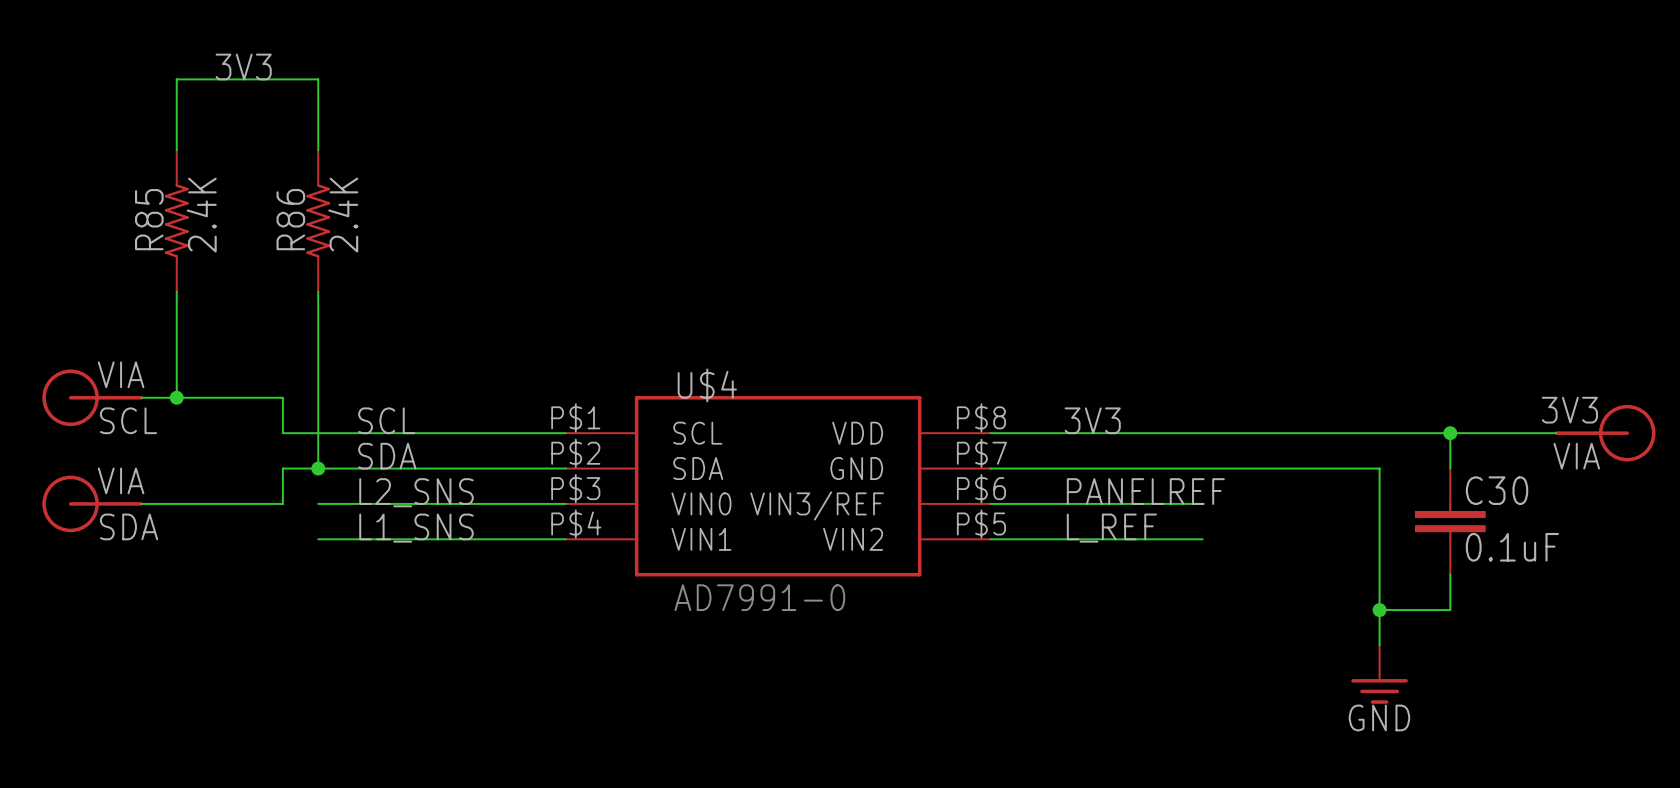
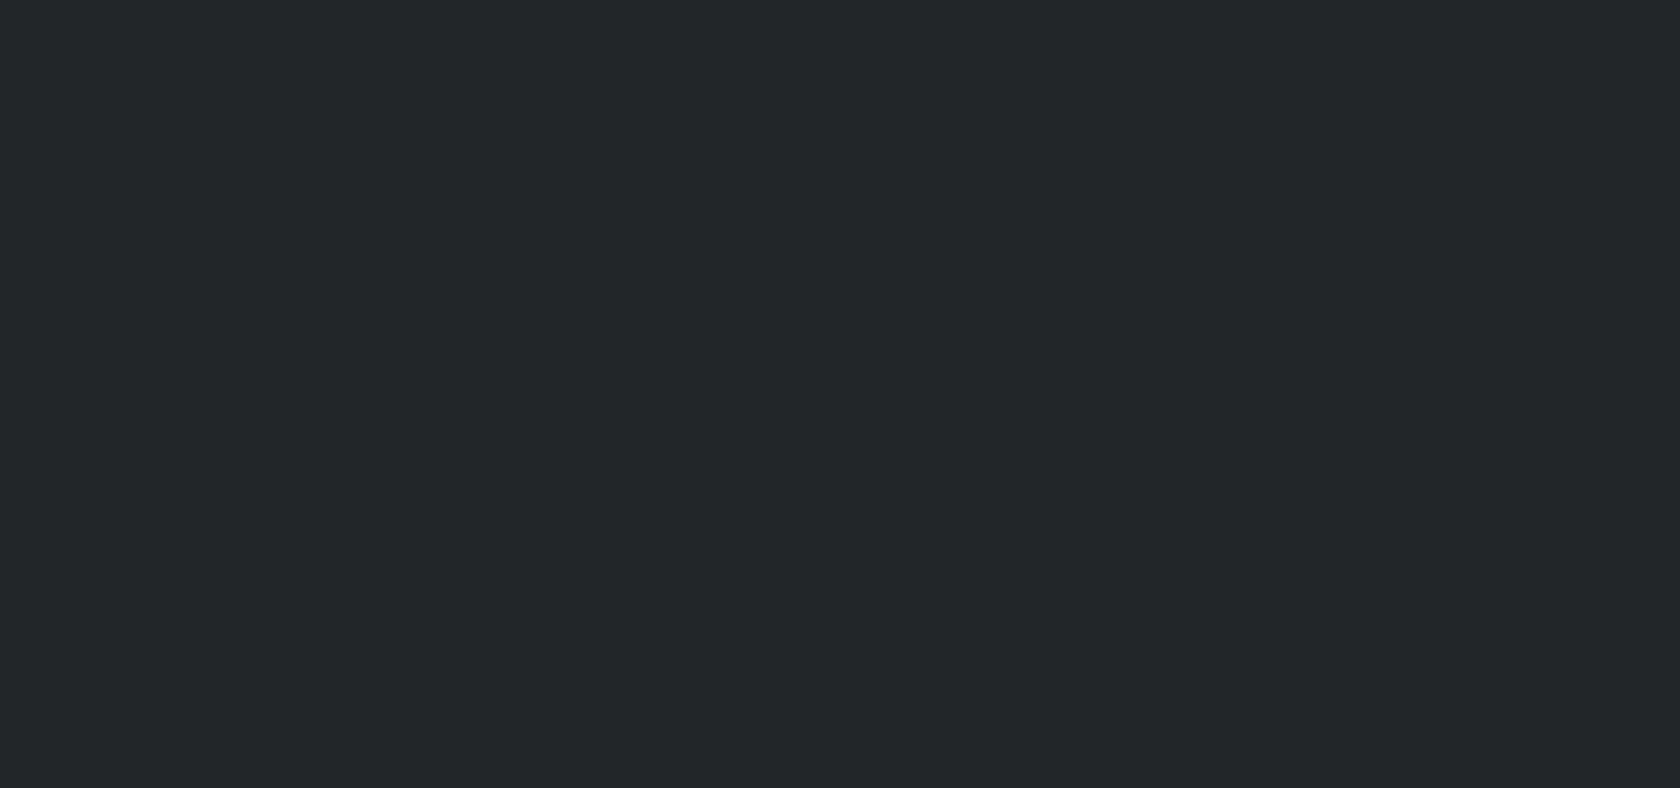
label: 3V3 (243, 67) -> none
wire: (176, 150) (176, 79) (318, 79) (318, 150) -> none
R85: 2.4K (176, 220) -> none
R86: 2.4K (318, 220) -> none
wire: (176, 291) (176, 397) -> none
wire: (318, 291) (318, 468) -> none
part: SCL (92, 397) -> none
wire: (141, 397) (282, 397) (282, 433) (565, 433) -> none
junction: (176, 397) -> none
label: SCL (386, 420) -> none
label: 3V3 (1092, 420) -> none
wire: (990, 433) (1556, 433) -> none
wire: (1450, 433) (1450, 468) -> none
junction: (1450, 433) -> none
part: 3V3 (1605, 433) -> none
label: SDA (387, 456) -> none
junction: (318, 468) -> none
wire: (565, 468) (282, 468) (282, 503) (141, 503) -> none
wire: (990, 468) (1379, 468) (1379, 645) -> none
U$4: AD7991-0 (778, 486) -> none
label: PANELREF (1145, 491) -> none
label: L2_SNS (416, 492) -> none
part: SDA (92, 503) -> none
wire: (318, 503) (565, 503) -> none
wire: (990, 503) (1202, 503) -> none
C30: 0.1uF (1450, 521) -> none
label: L1_SNS (416, 528) -> none
label: L_REF (1111, 528) -> none
wire: (318, 539) (565, 539) -> none
wire: (990, 539) (1202, 539) -> none
wire: (1450, 574) (1450, 610) (1379, 610) -> none
junction: (1379, 610) -> none
power symbol: GND (1379, 674) -> none

